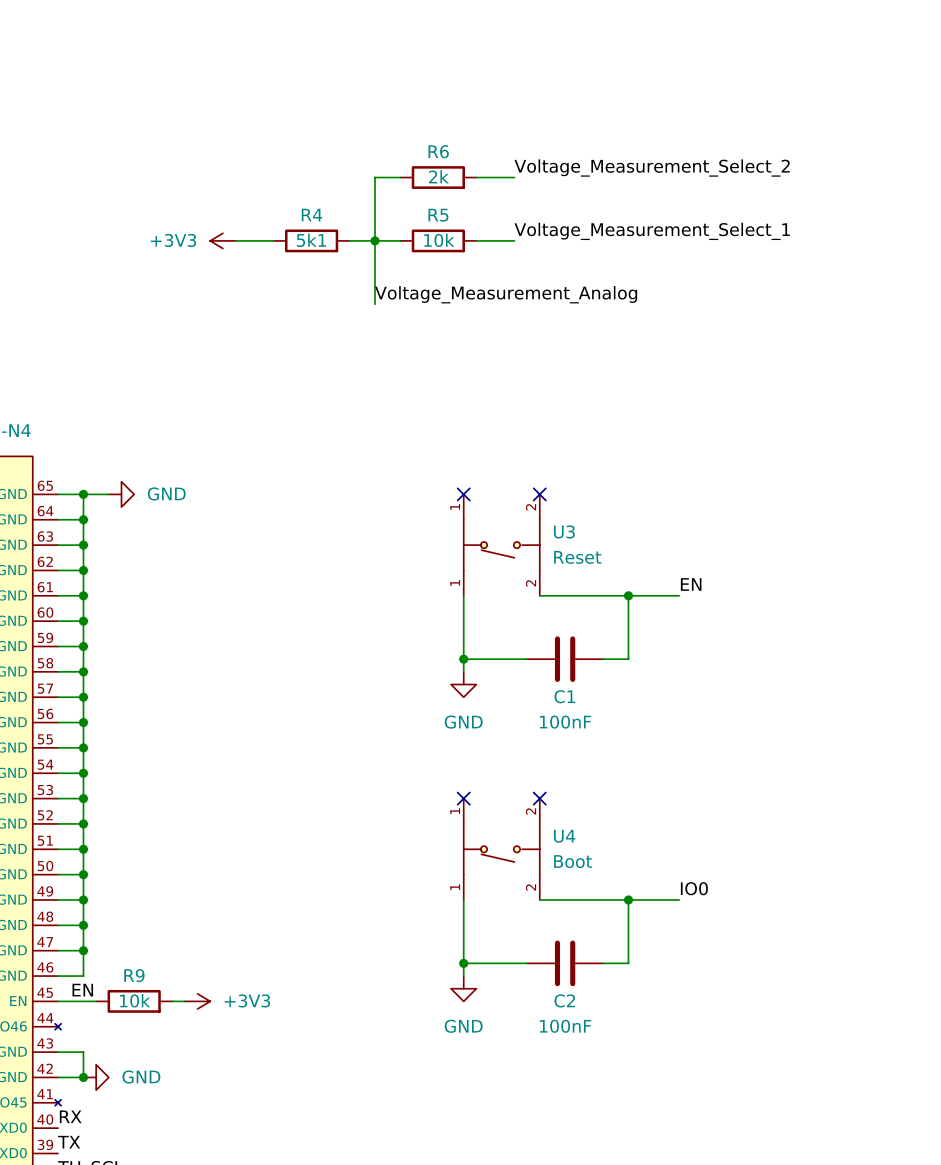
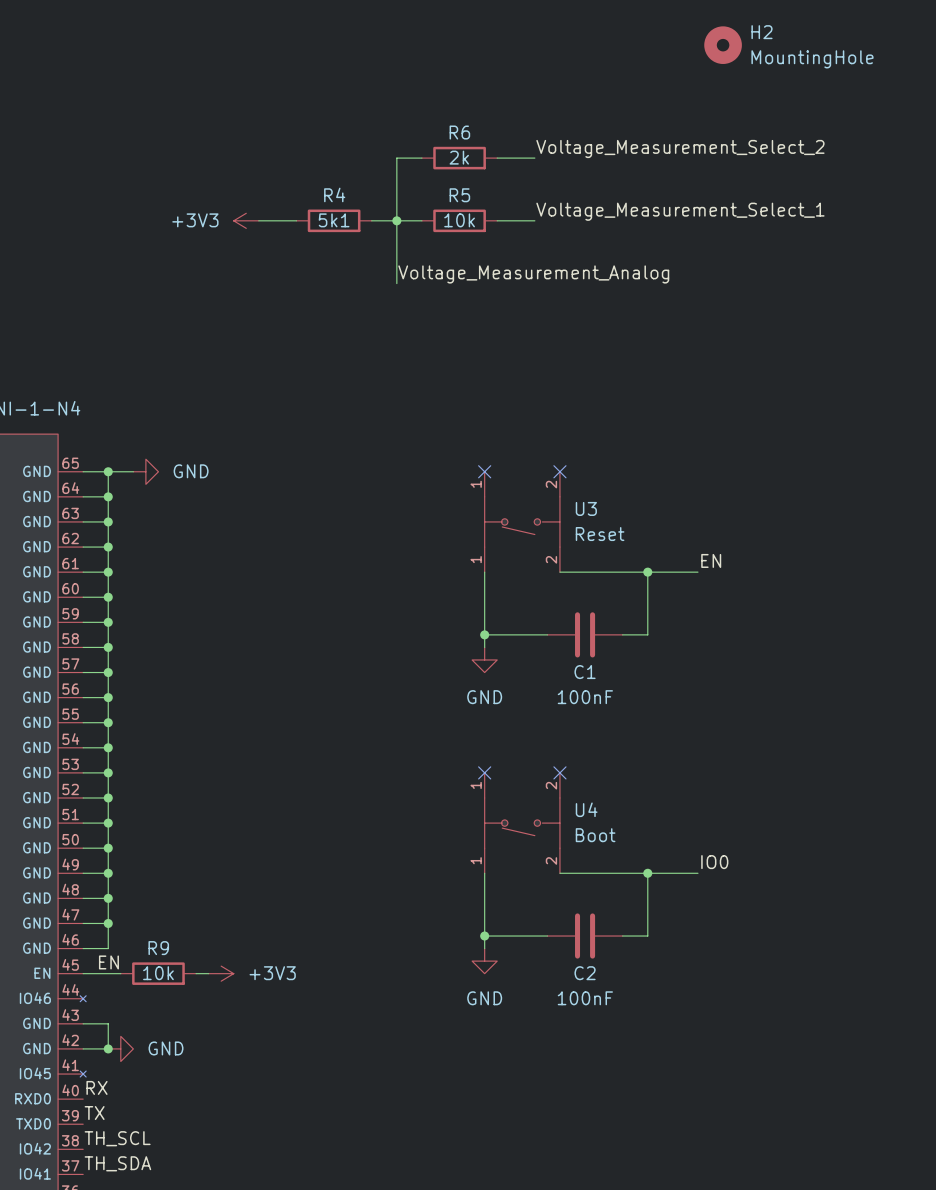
H2: none -> MountingHole (723, 45)

